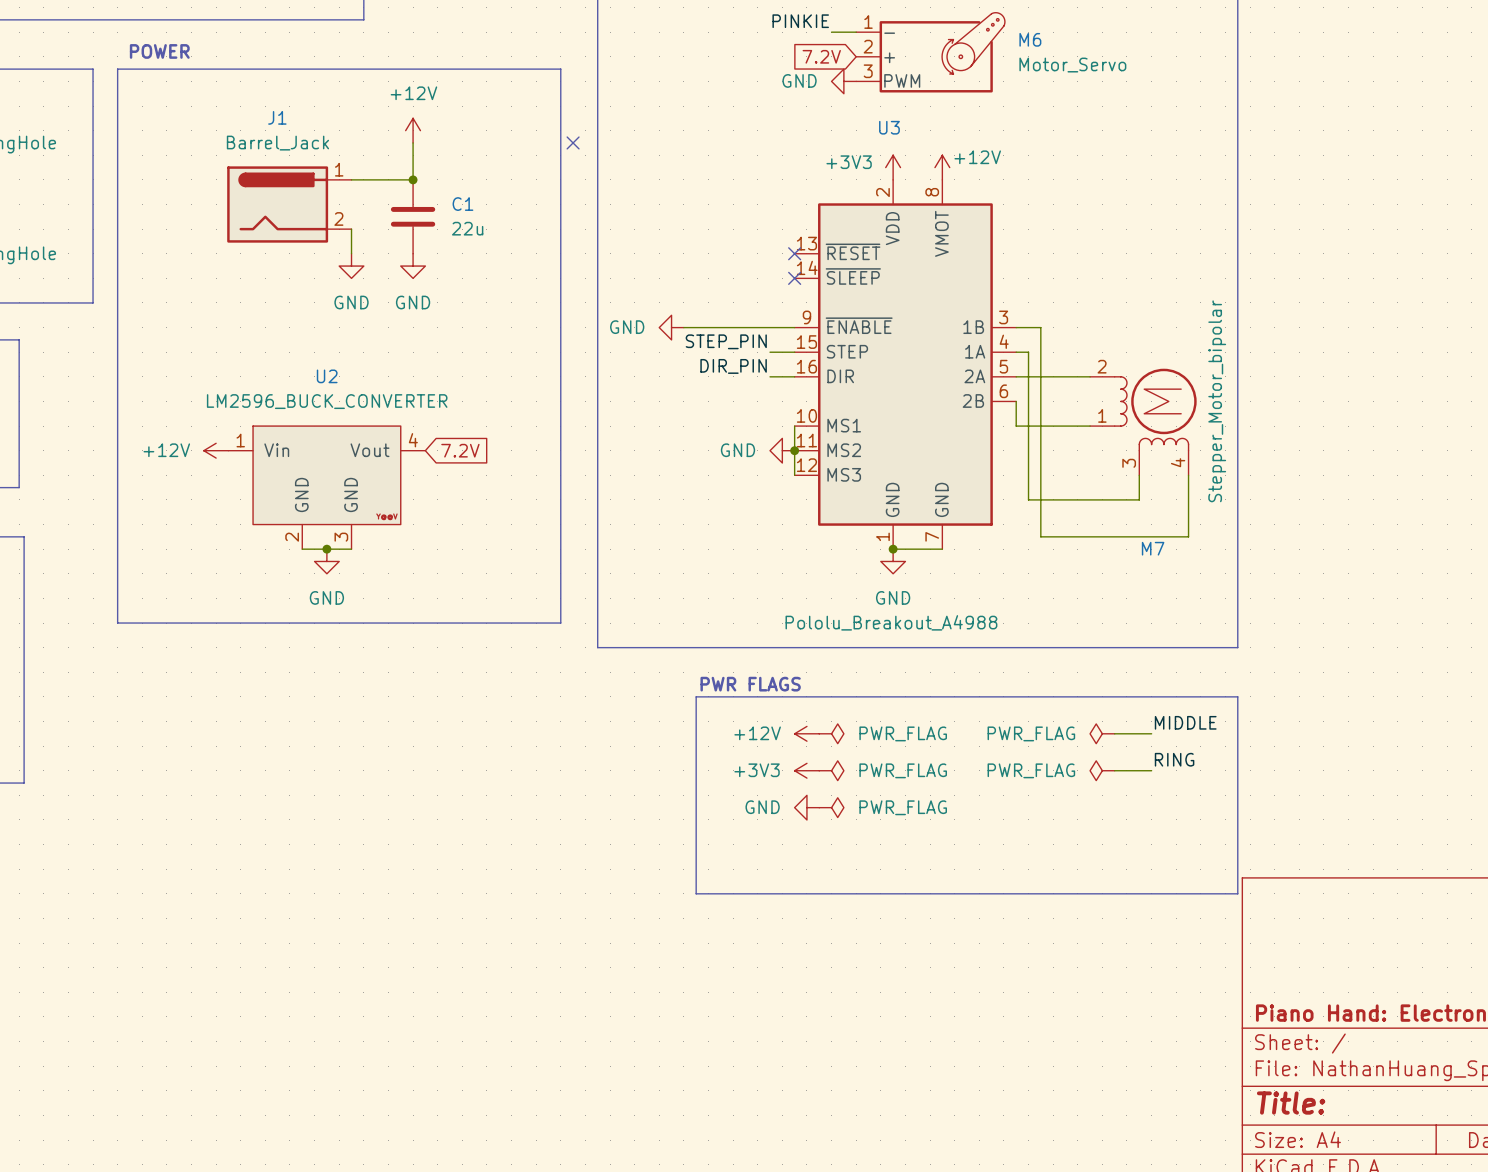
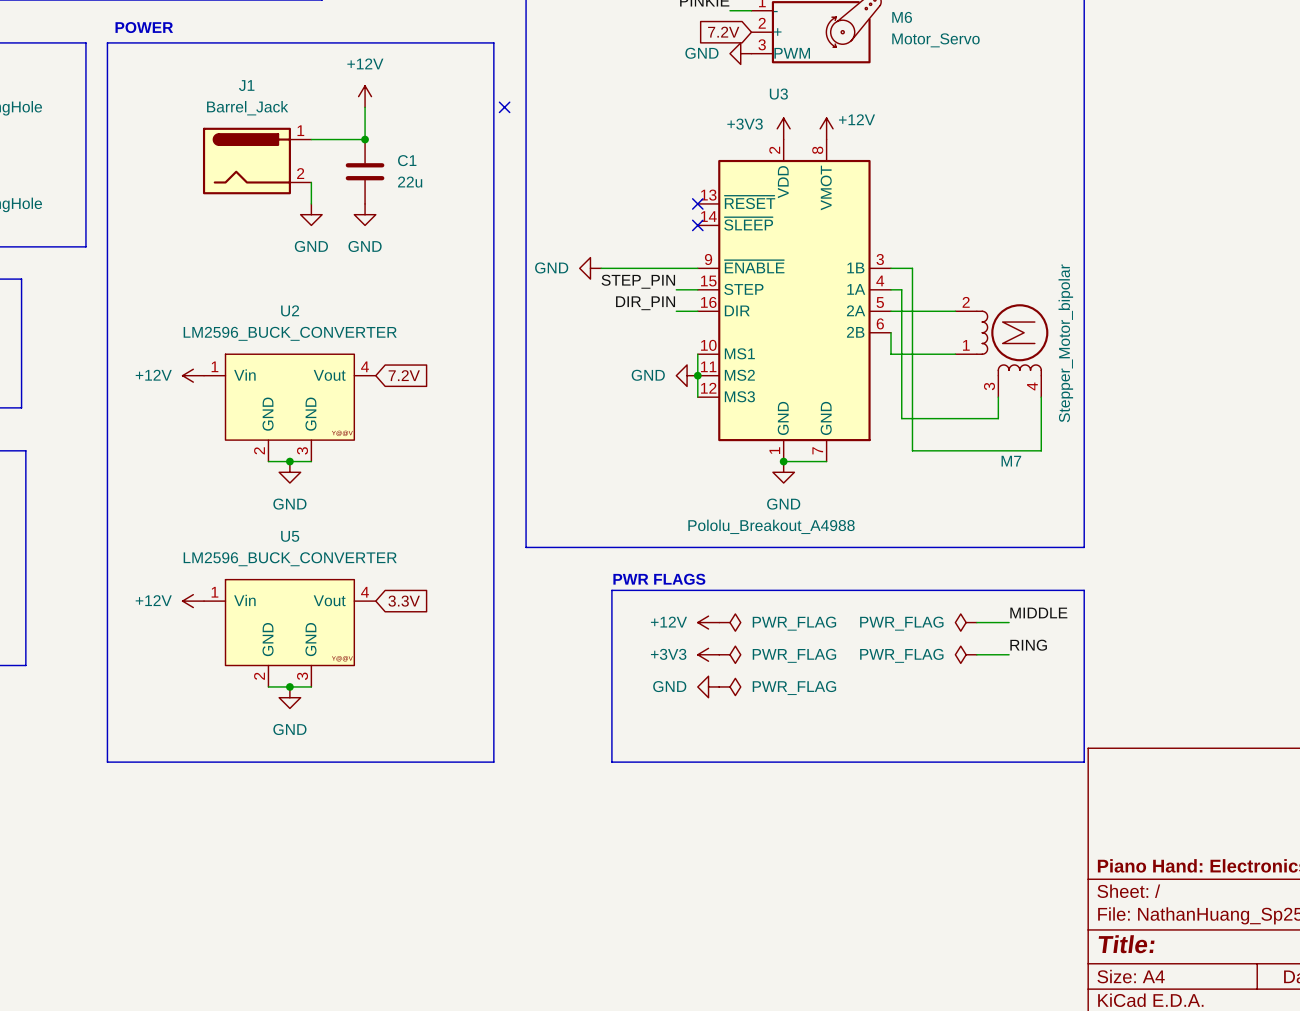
line: (117, 623) (560, 623) -> (107, 525) (107, 762) (493, 762) (493, 525)
power symbol: none -> +12V (193, 601)
global label: none -> 3.3V (404, 601)
U5: none -> LM2596_BUCK_CONVERTER (289, 633)
wire: none -> (268, 686) (311, 686)
junction: none -> (289, 686)
power symbol: none -> GND (289, 697)

